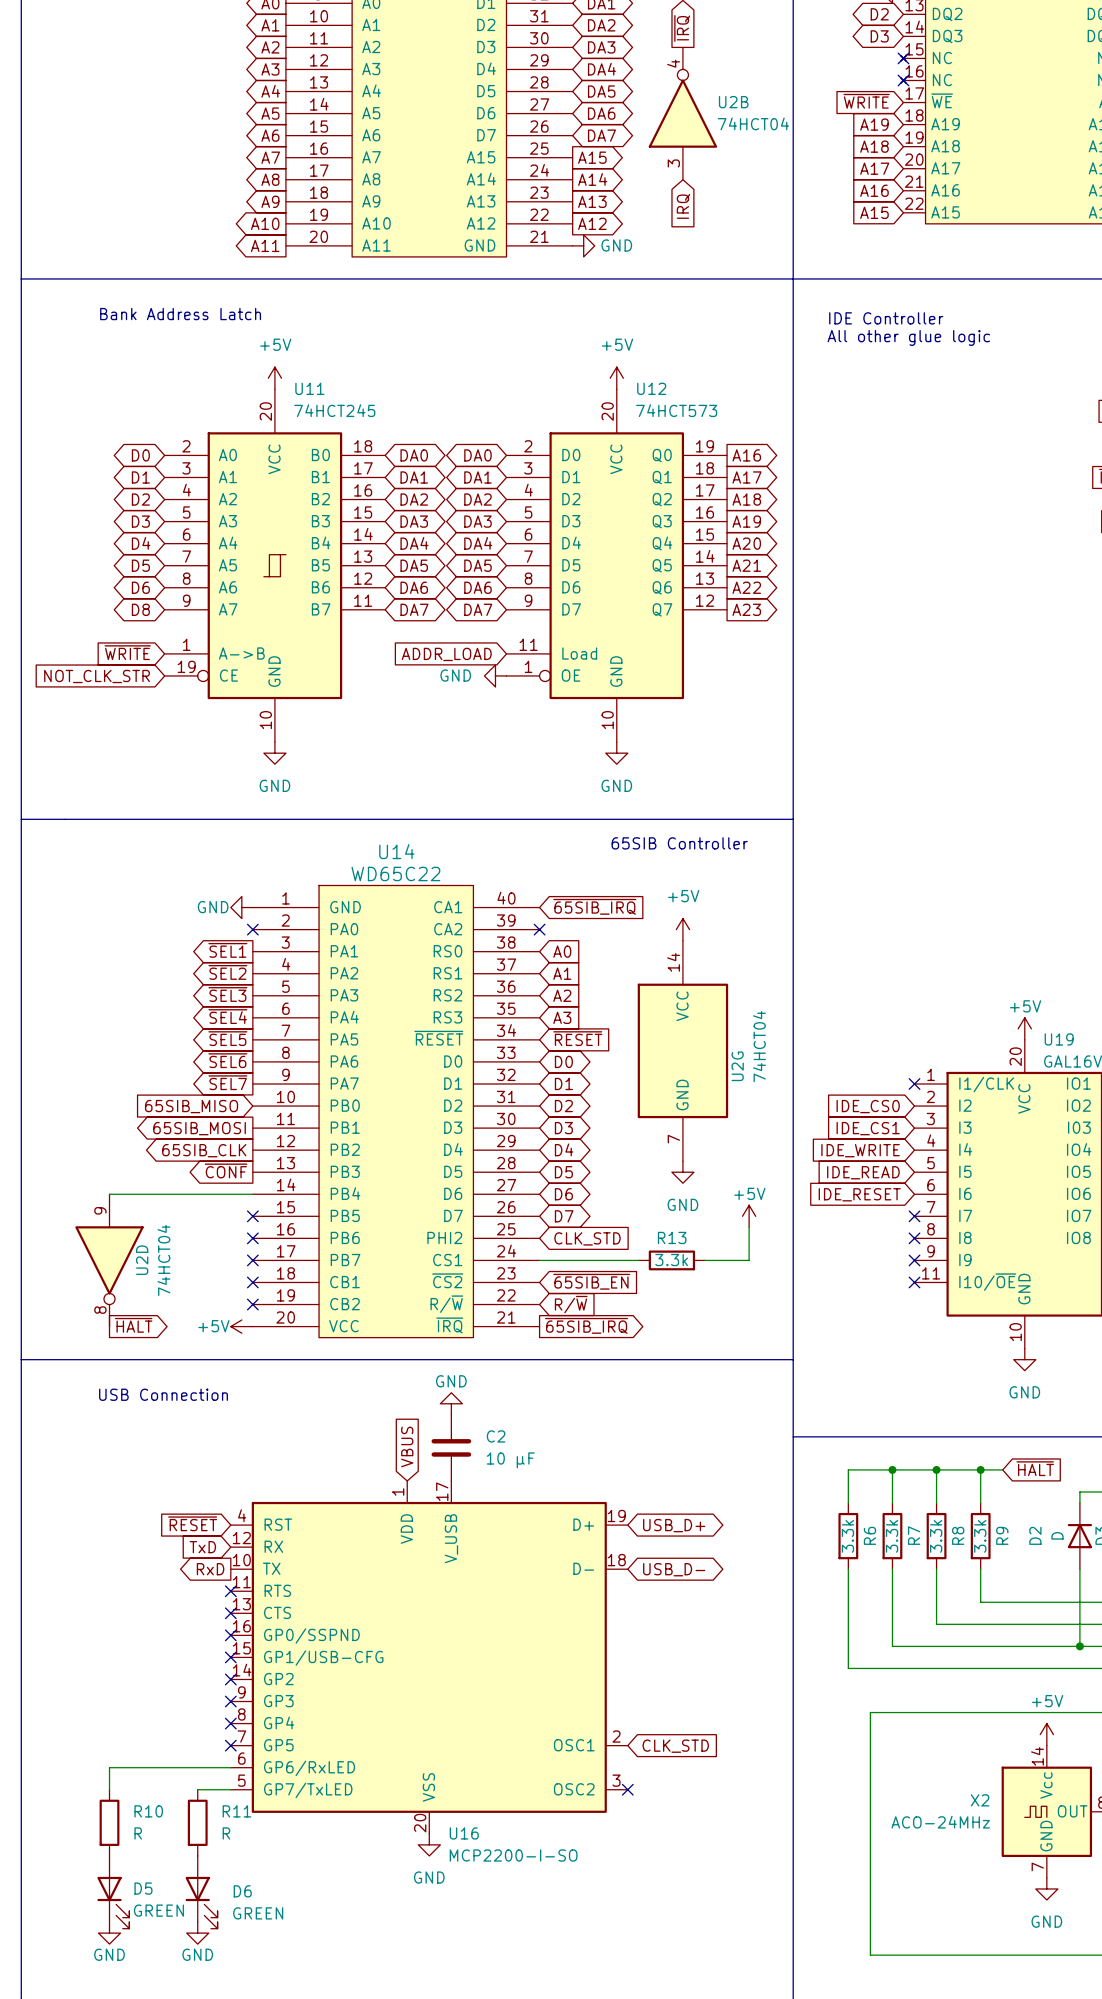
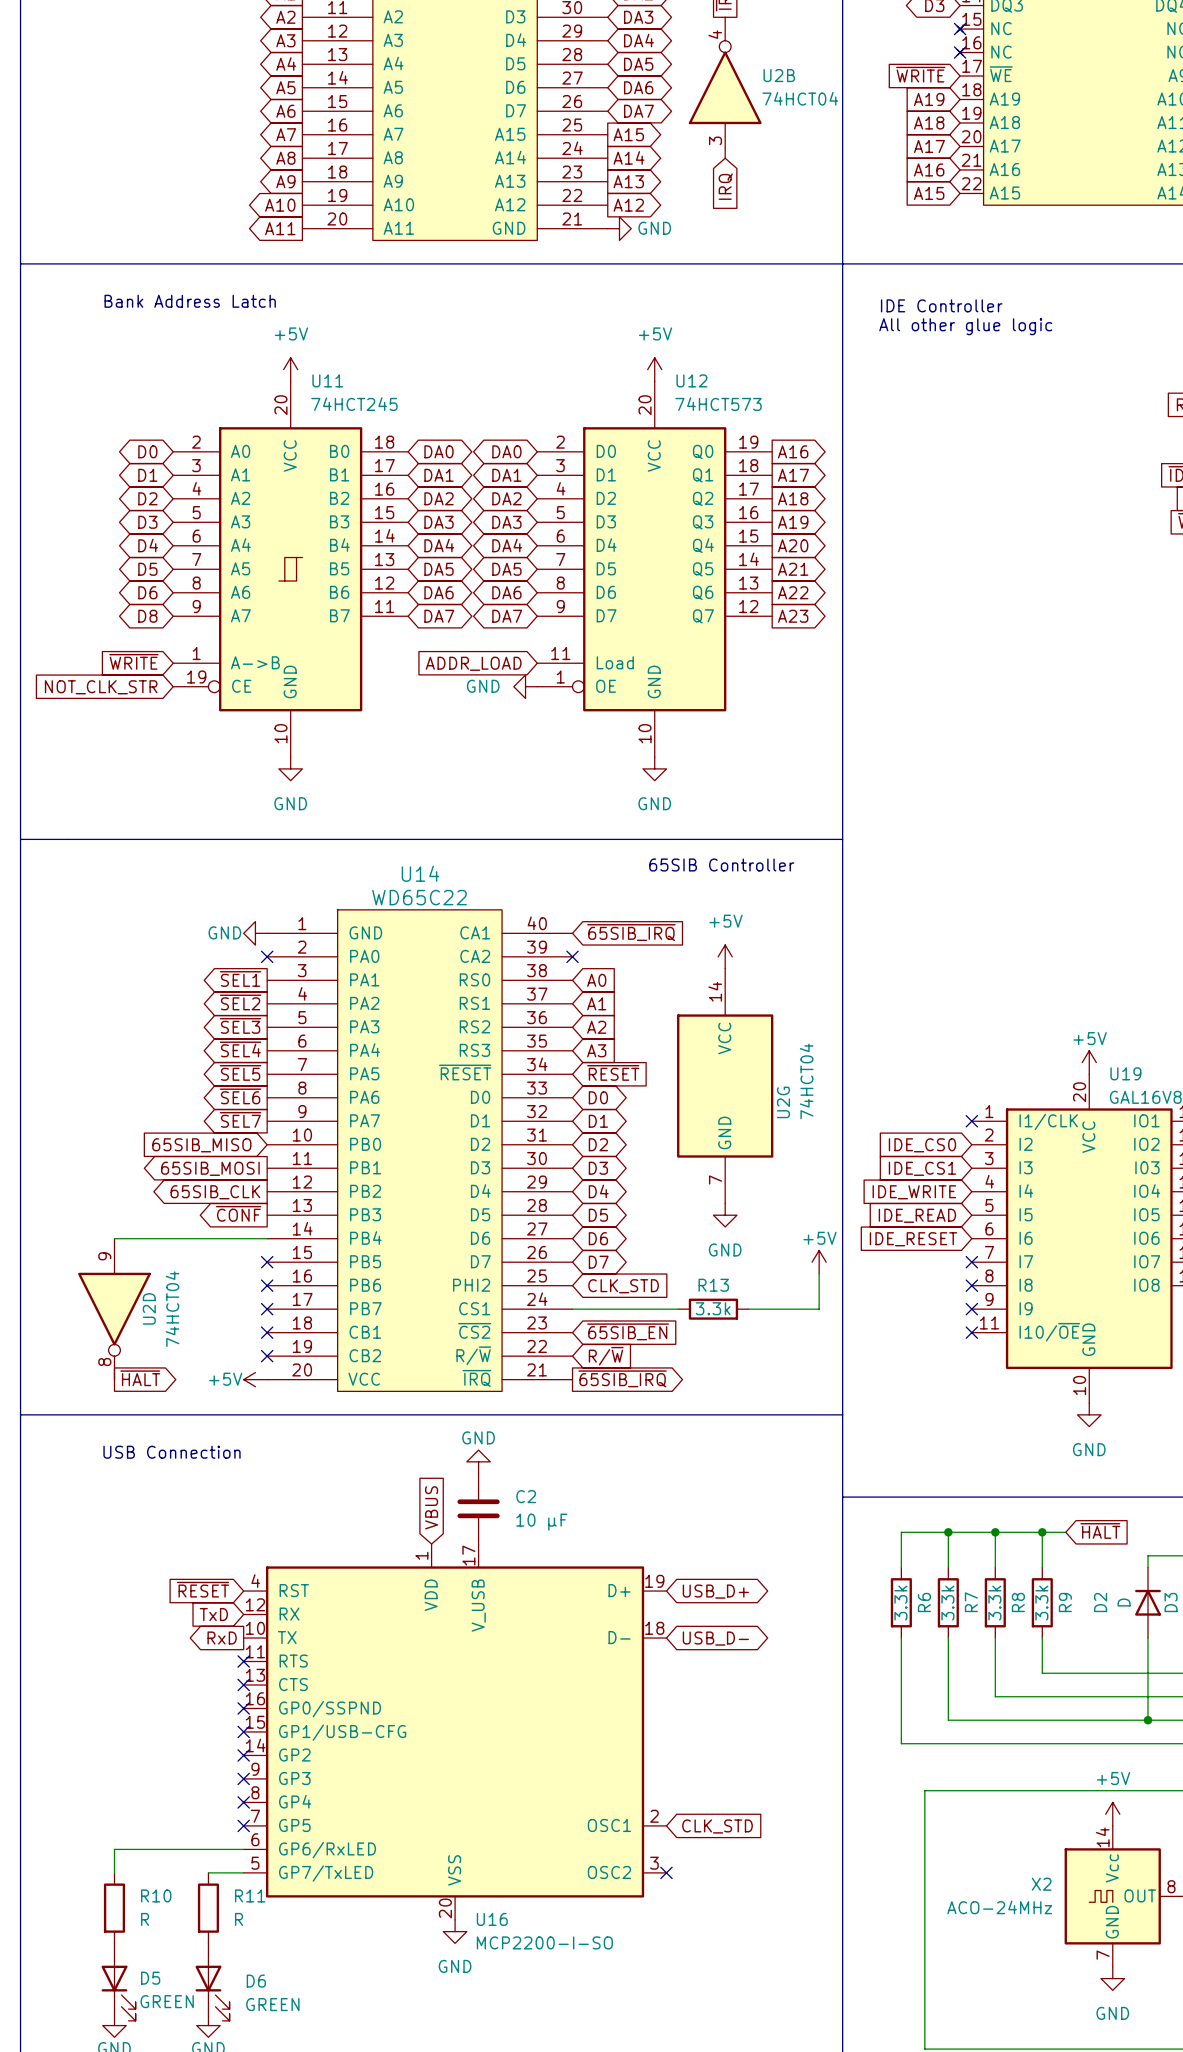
power symbol position: +5V (749, 1216) -> +5V (819, 1262)
wire: (749, 1227) (749, 1260) -> (819, 1273) (819, 1309) (795, 1309)

